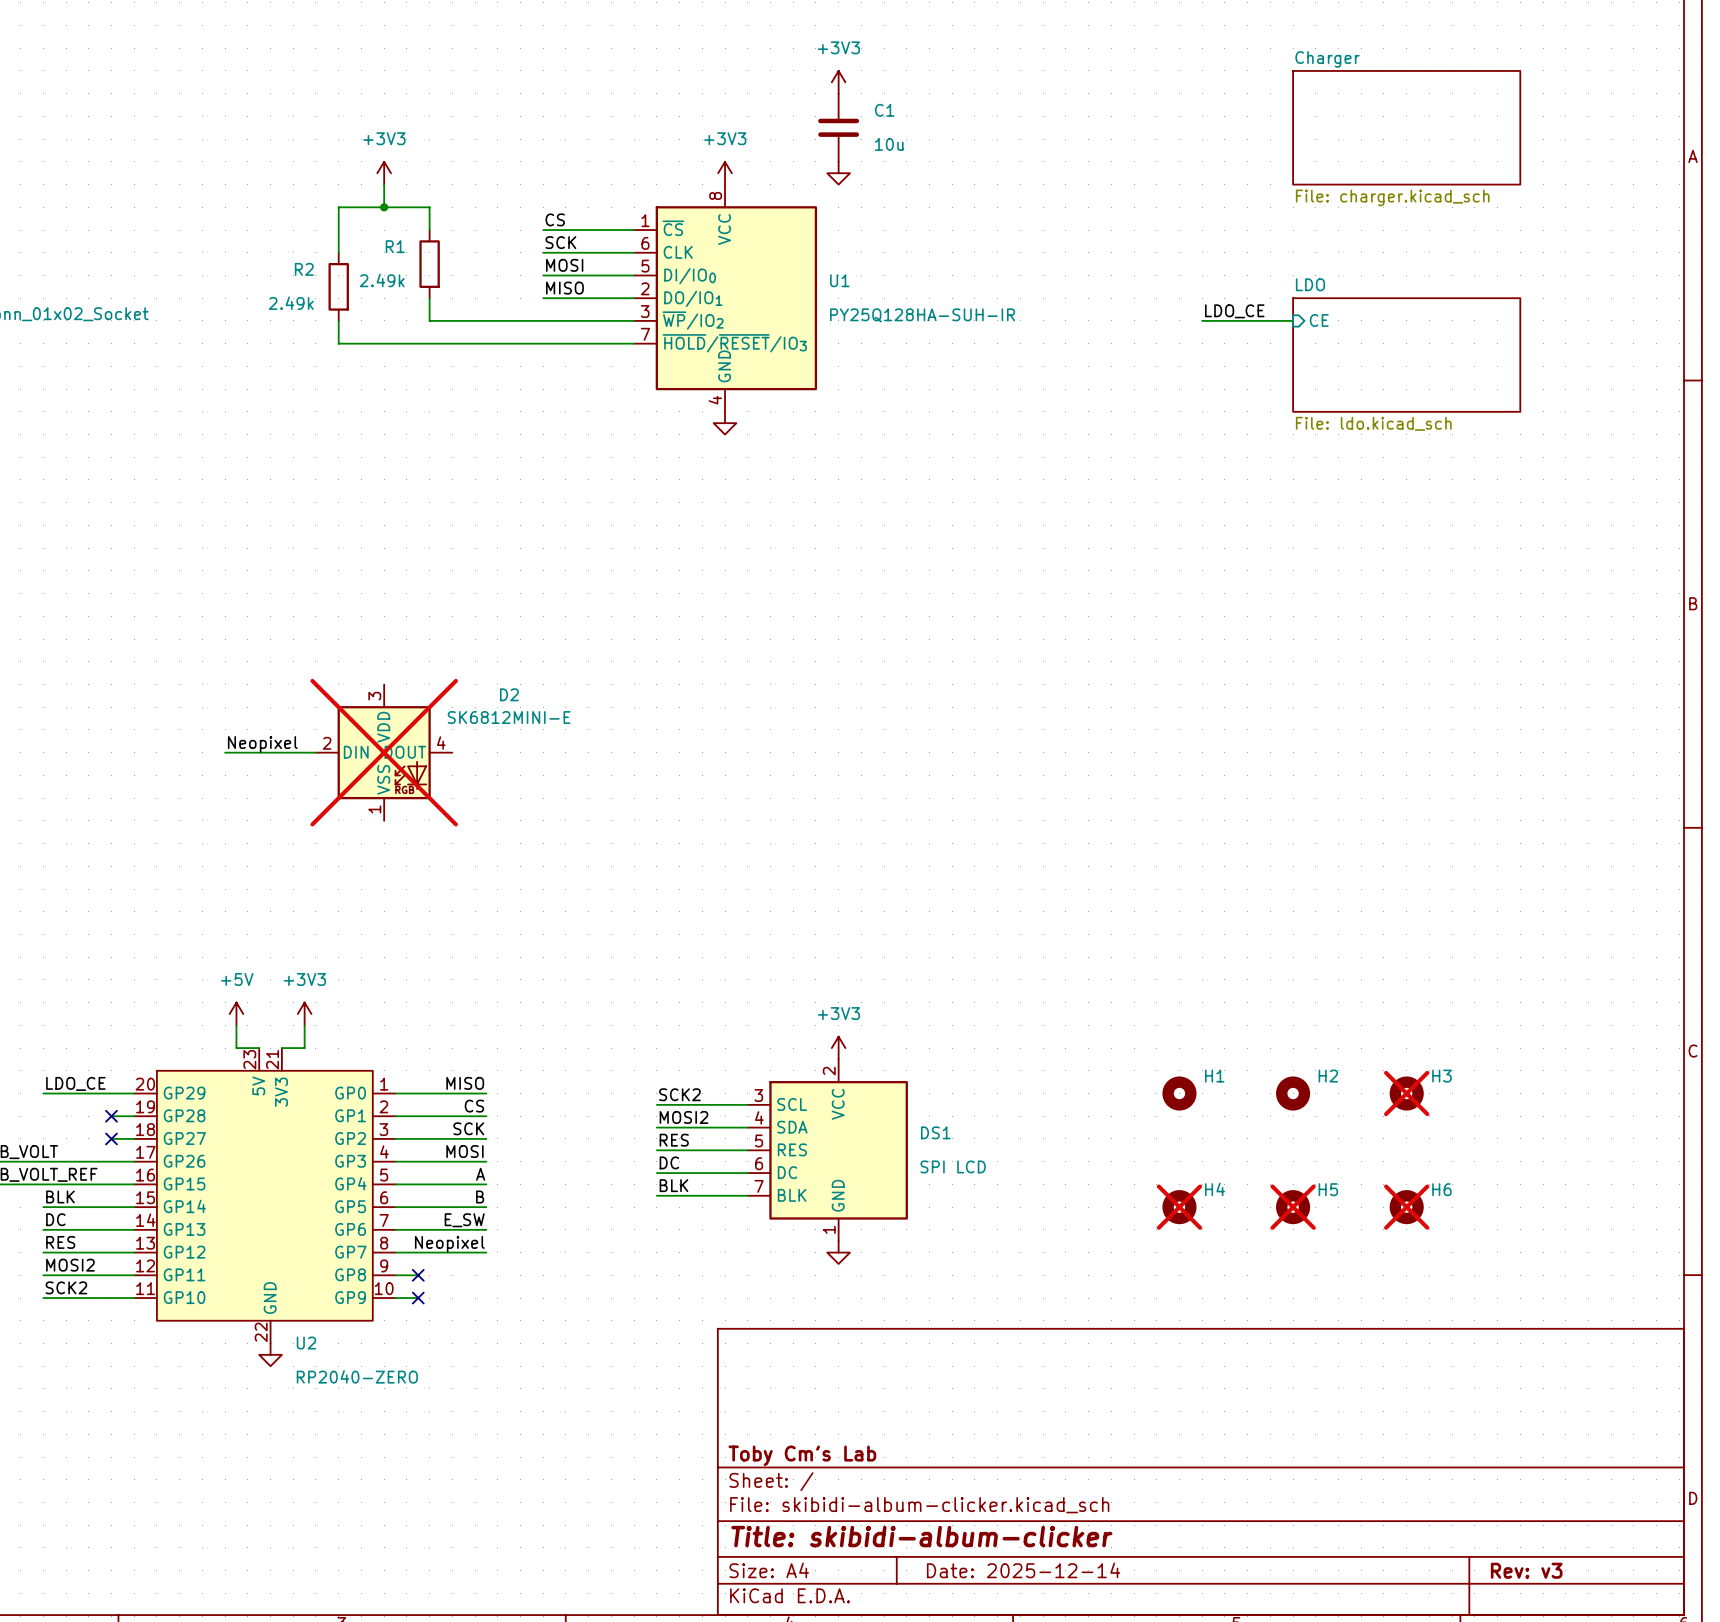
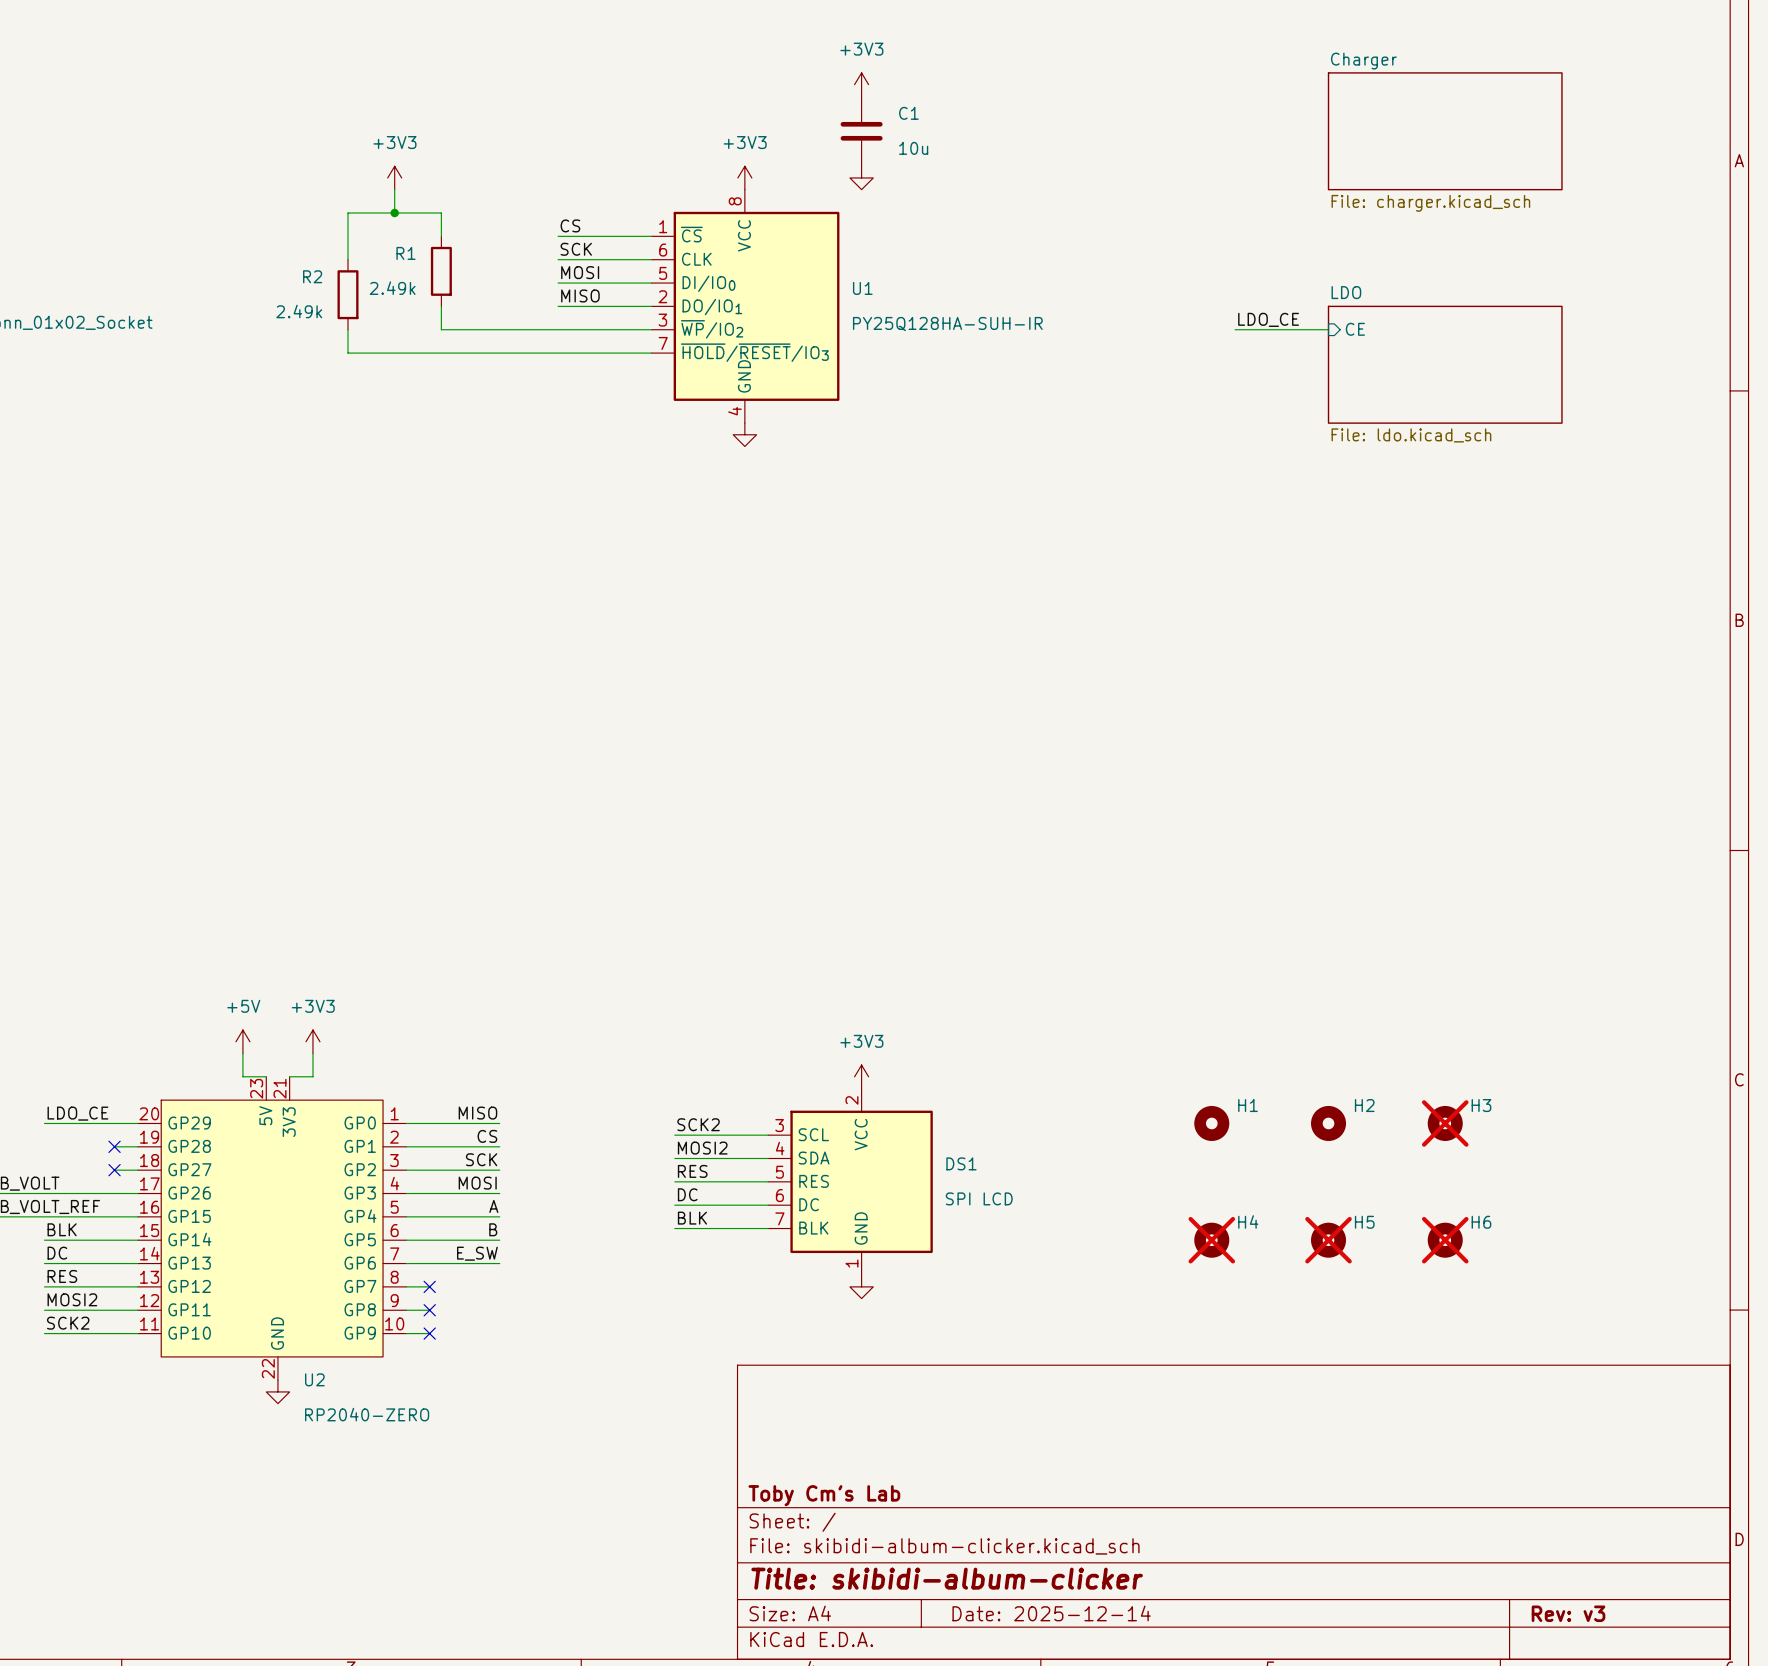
label: Neopixel (262, 744) -> none
wire: (225, 752) (315, 752) -> none
D2: SK6812MINI-E (384, 752) -> none
label: Neopixel (449, 1244) -> none
wire: (418, 1252) (486, 1252) -> none
no-connect mark: none -> (429, 1286)

